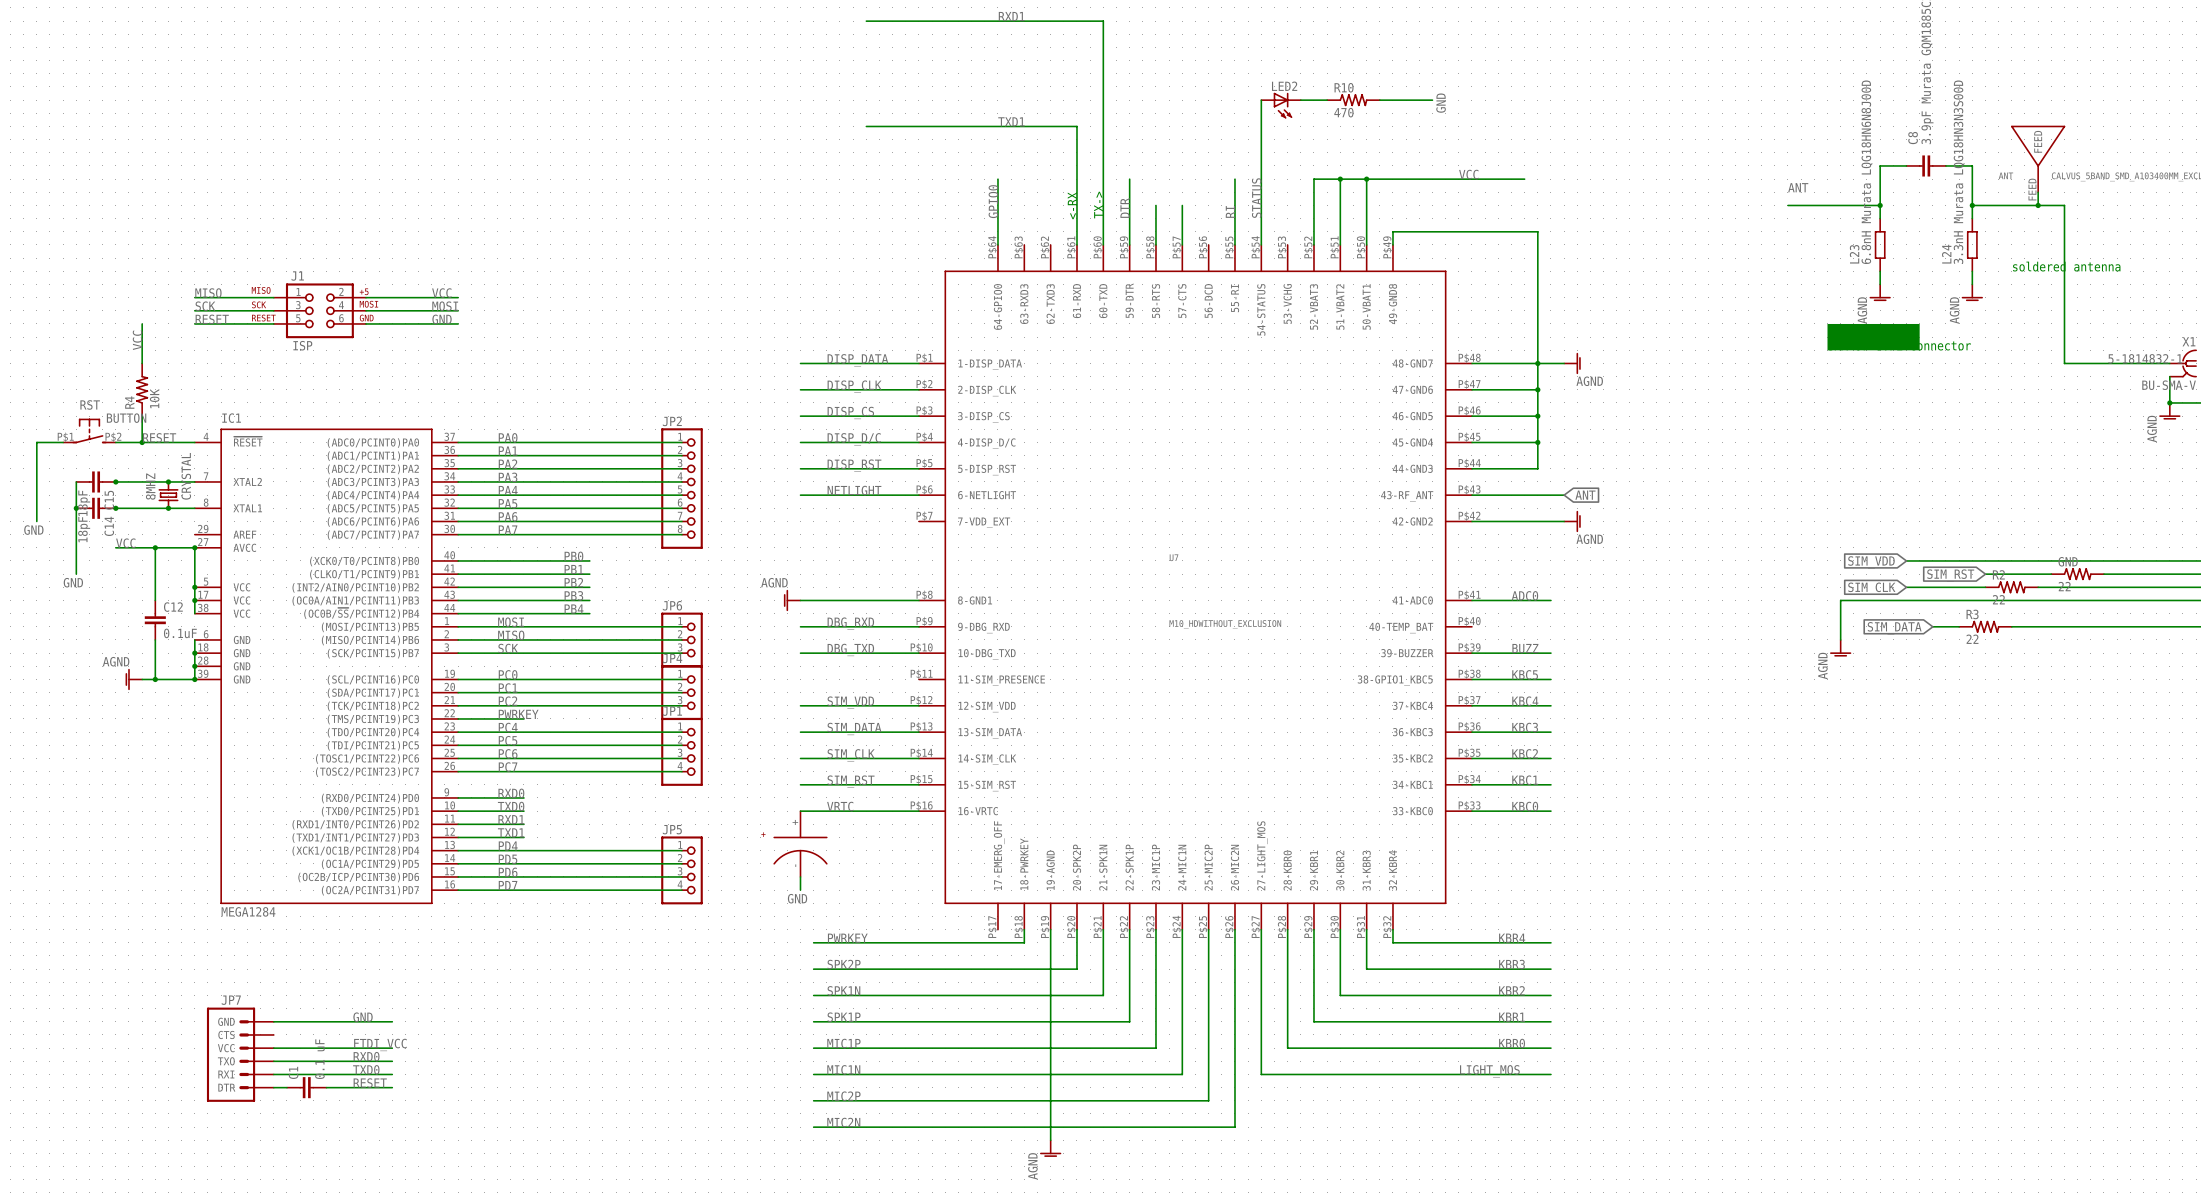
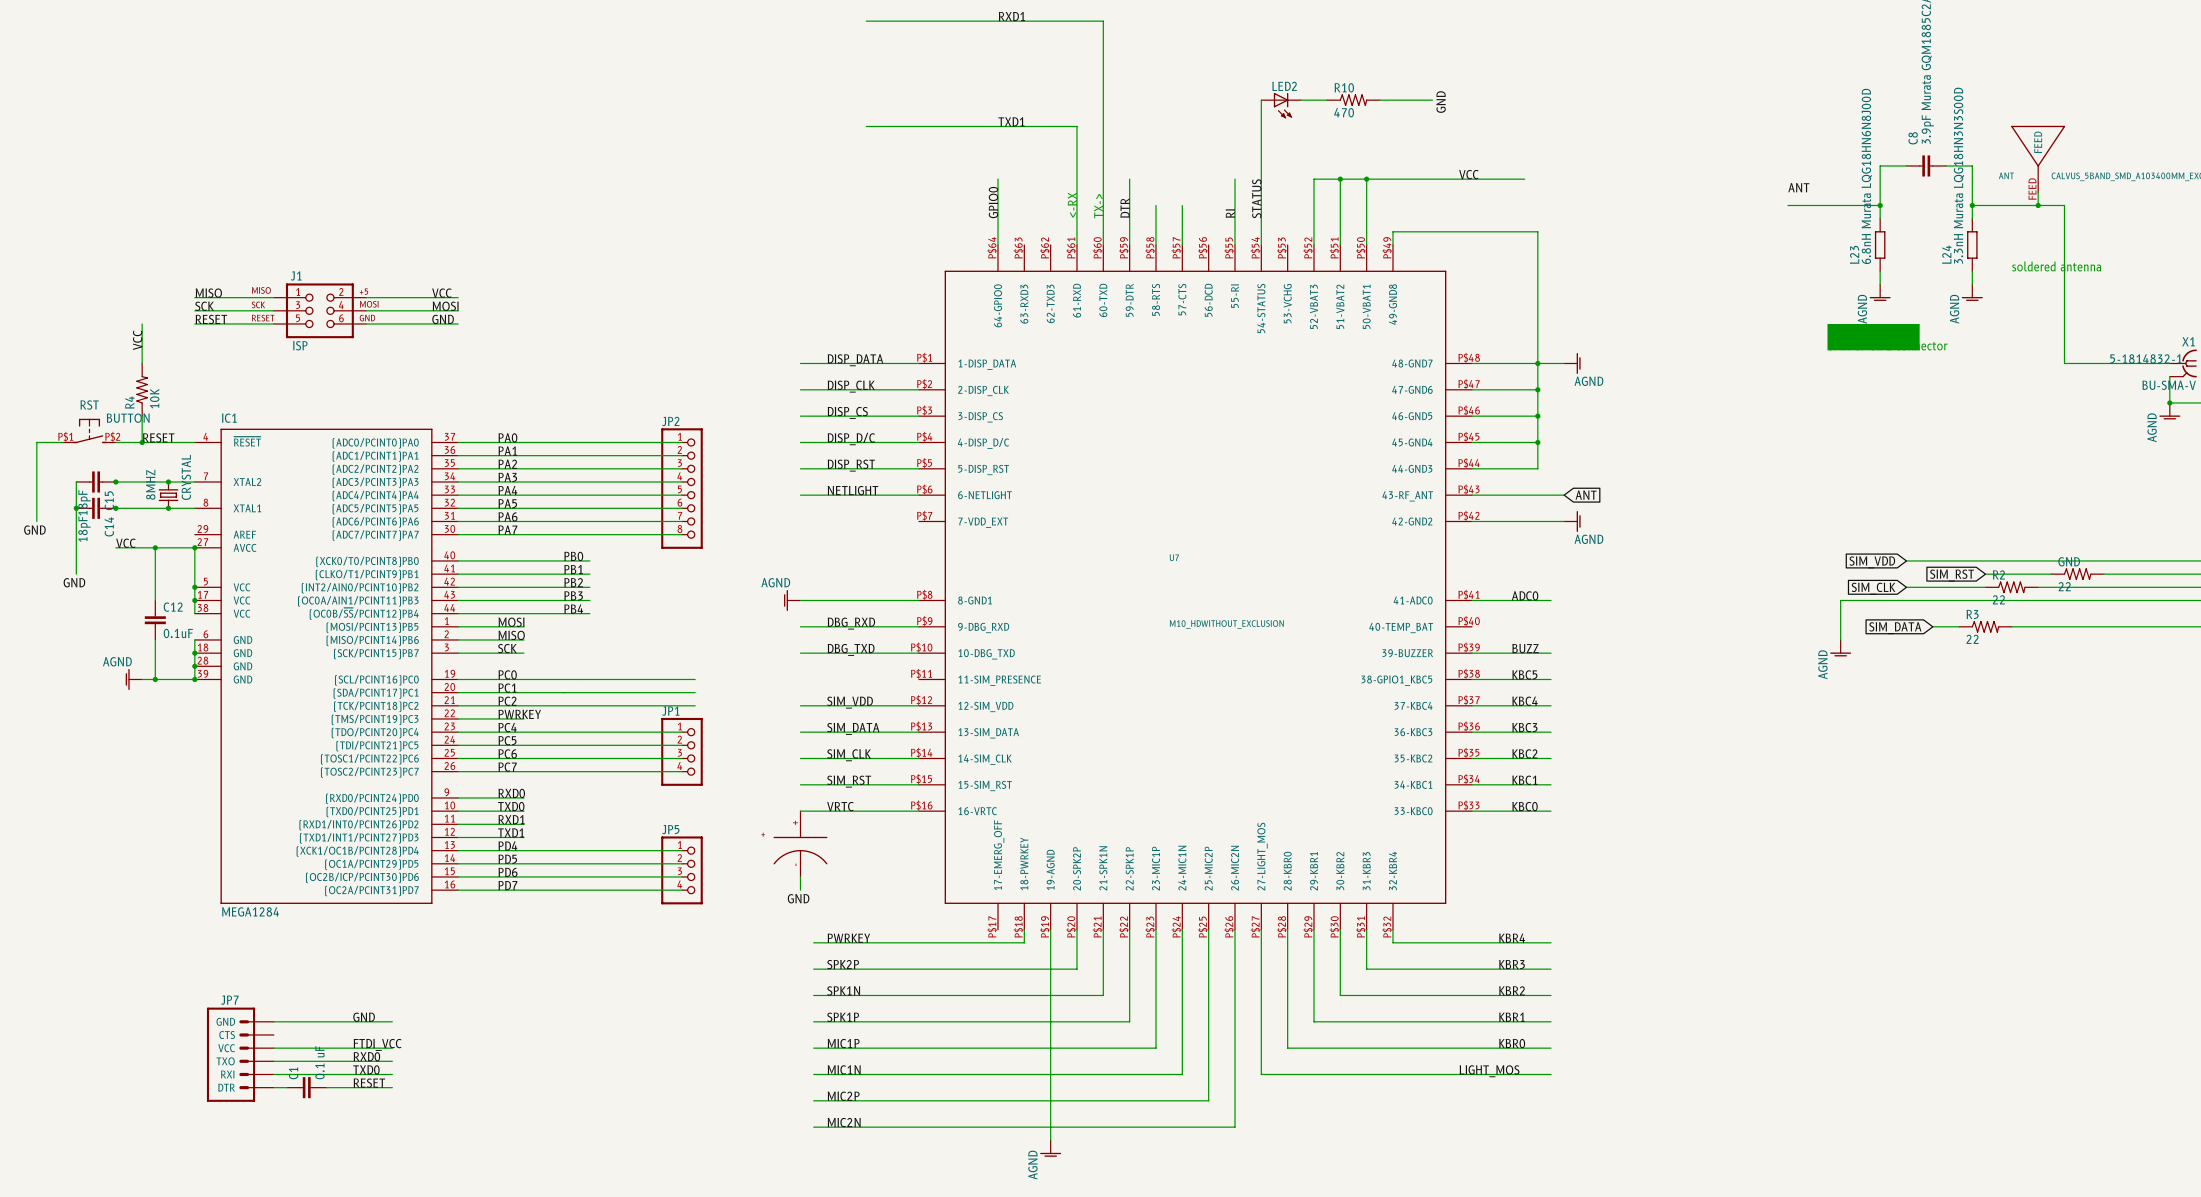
wire: (523, 626) (681, 626) -> none
wire: (523, 639) (681, 639) -> none
JP6: (681, 639) -> none
wire: (523, 653) (681, 653) -> none
JP4: (681, 692) -> none

